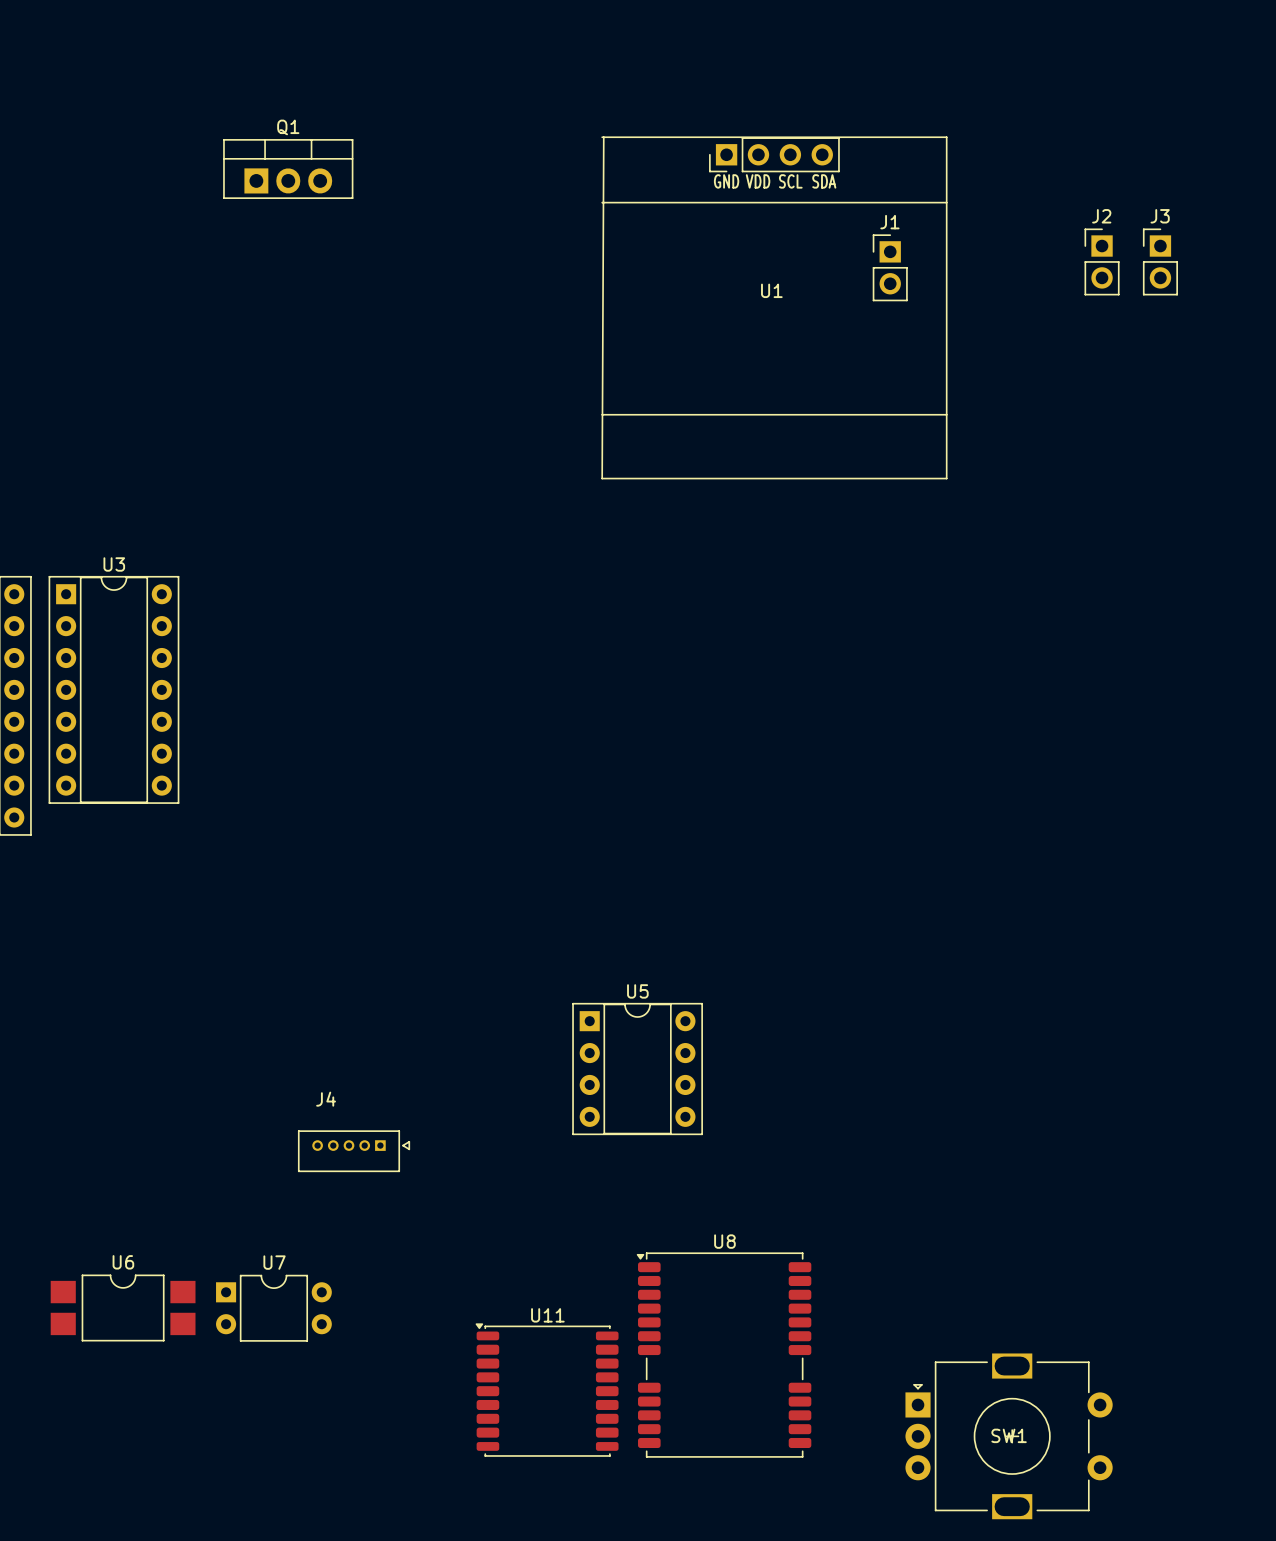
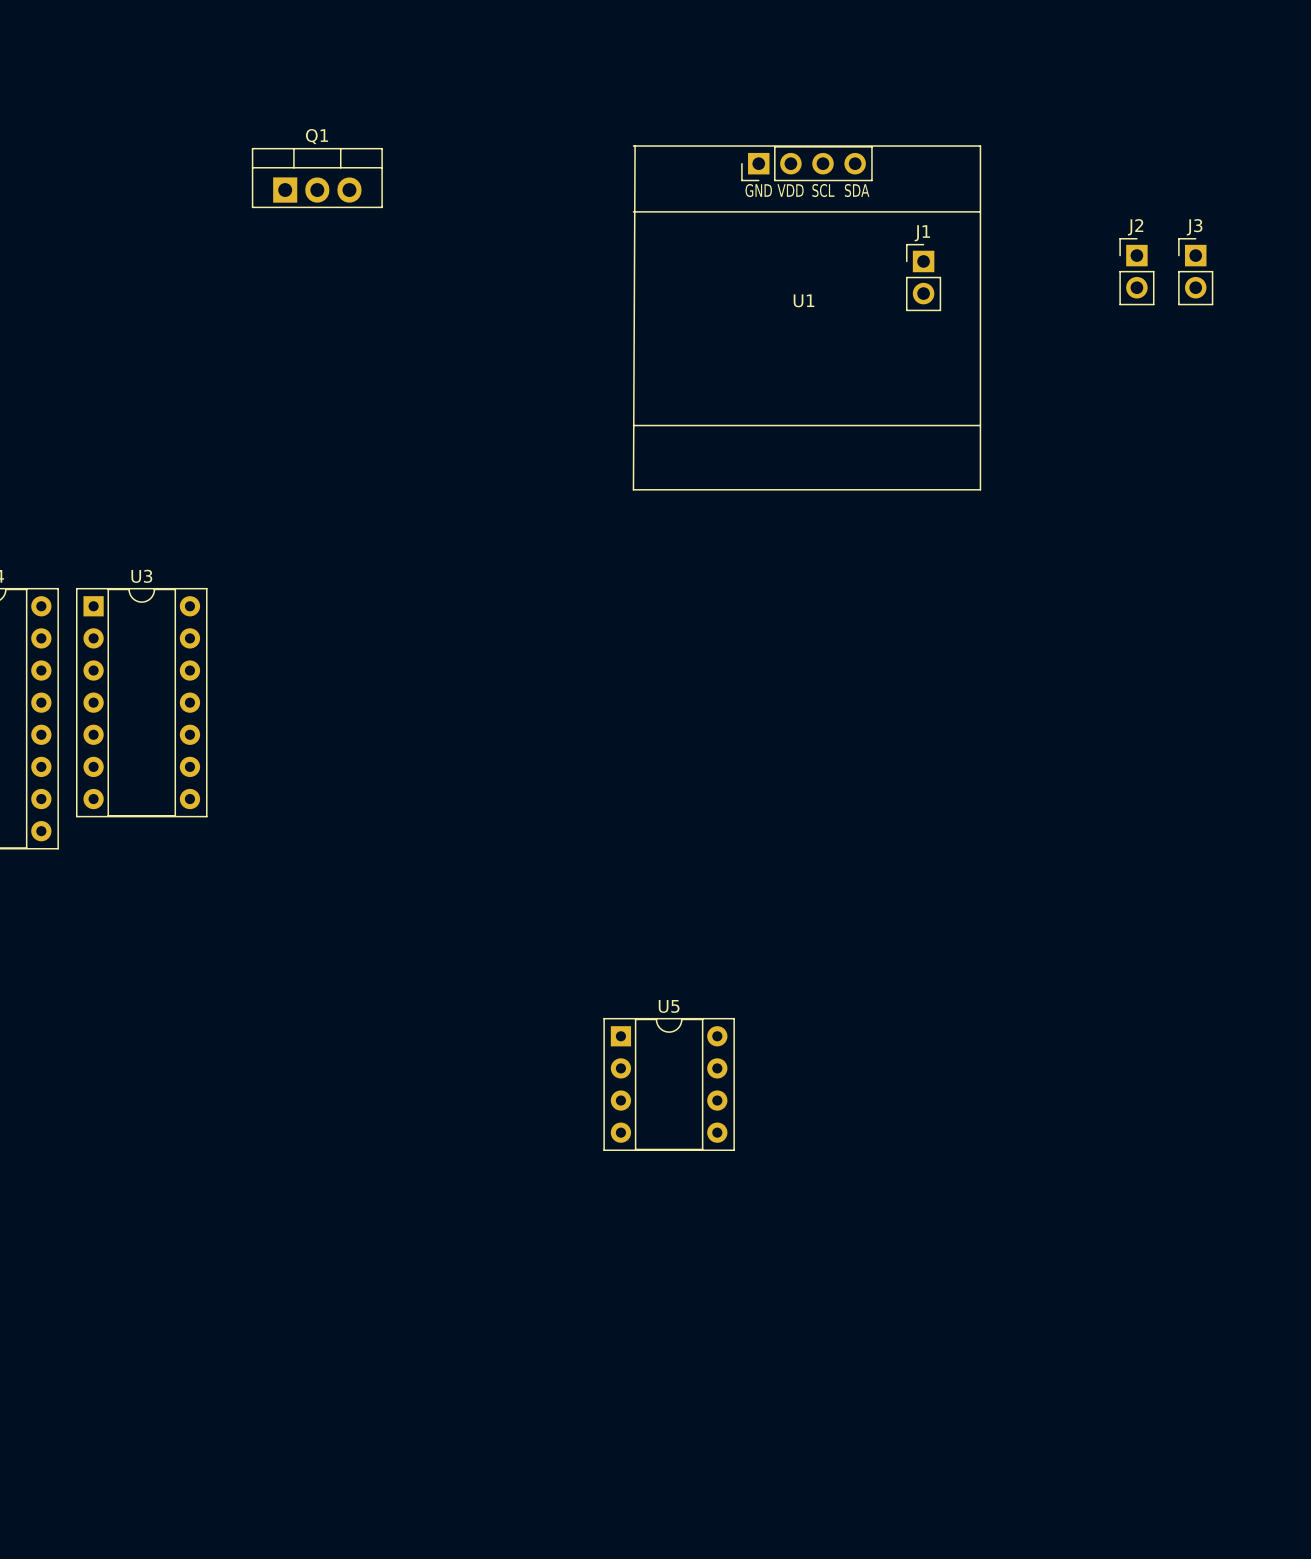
J4: (354, 1151) -> none
U6: (123, 1308) -> none
U7: (273, 1308) -> none
U8: (724, 1355) -> none
U11: (547, 1390) -> none
SW1: (1009, 1436) -> none

